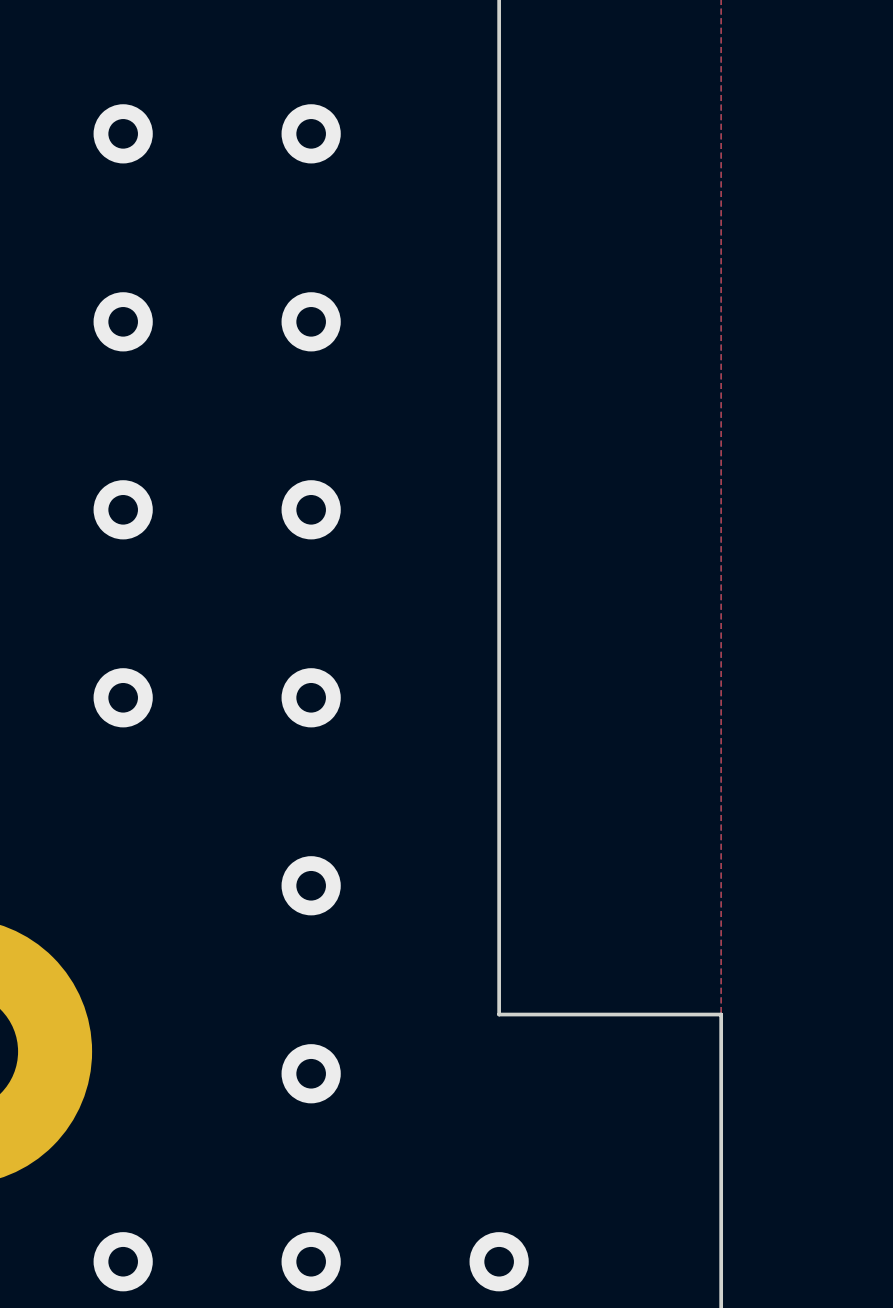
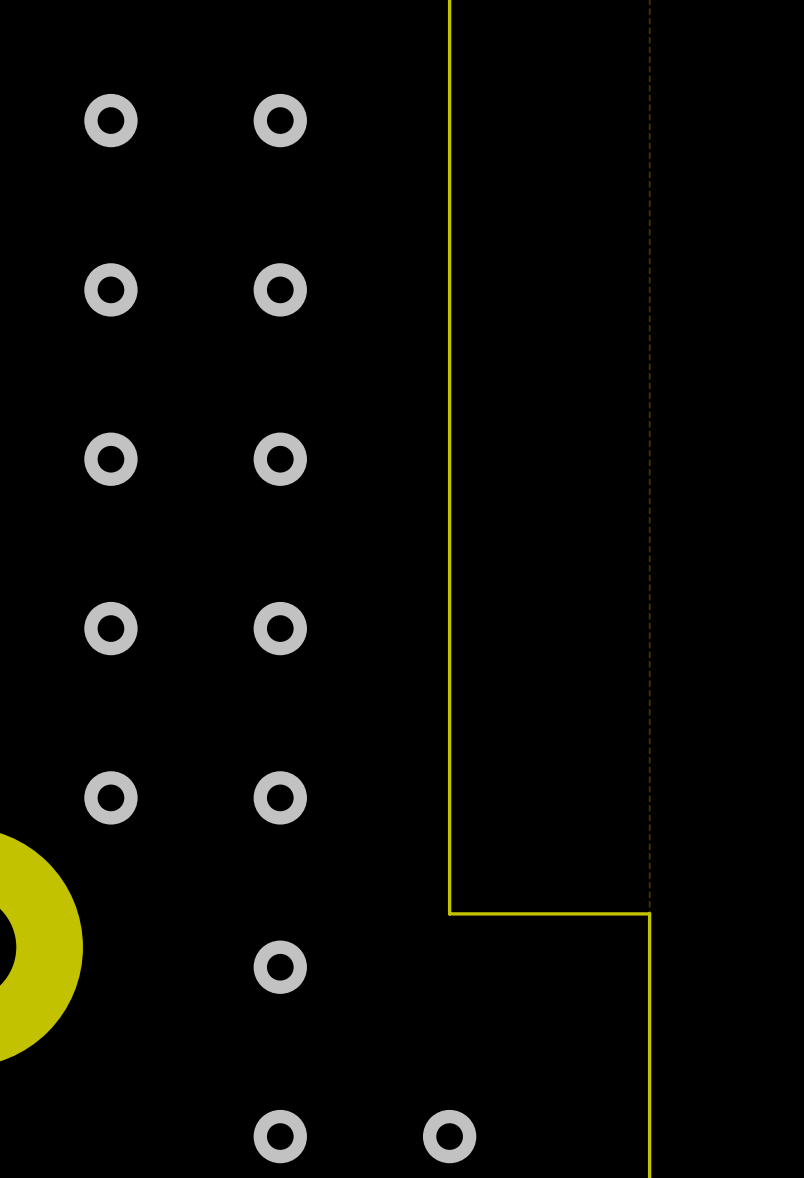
via position: (123, 1261) -> (110, 797)

